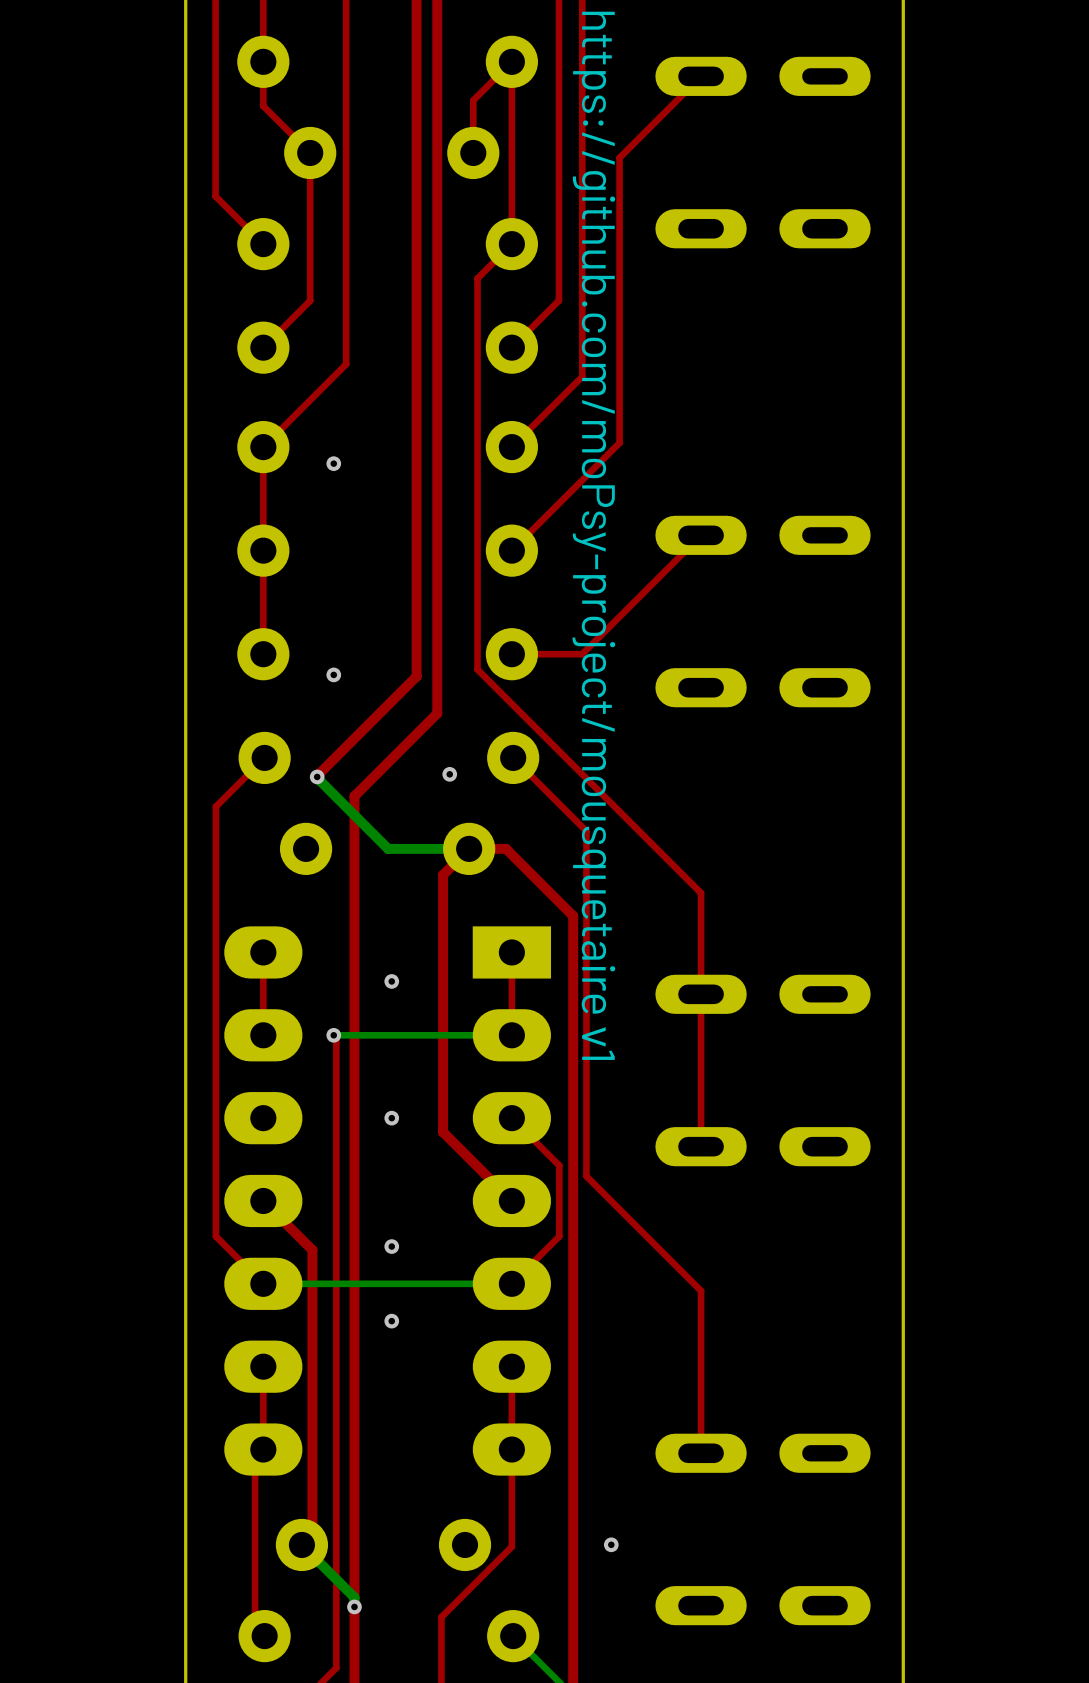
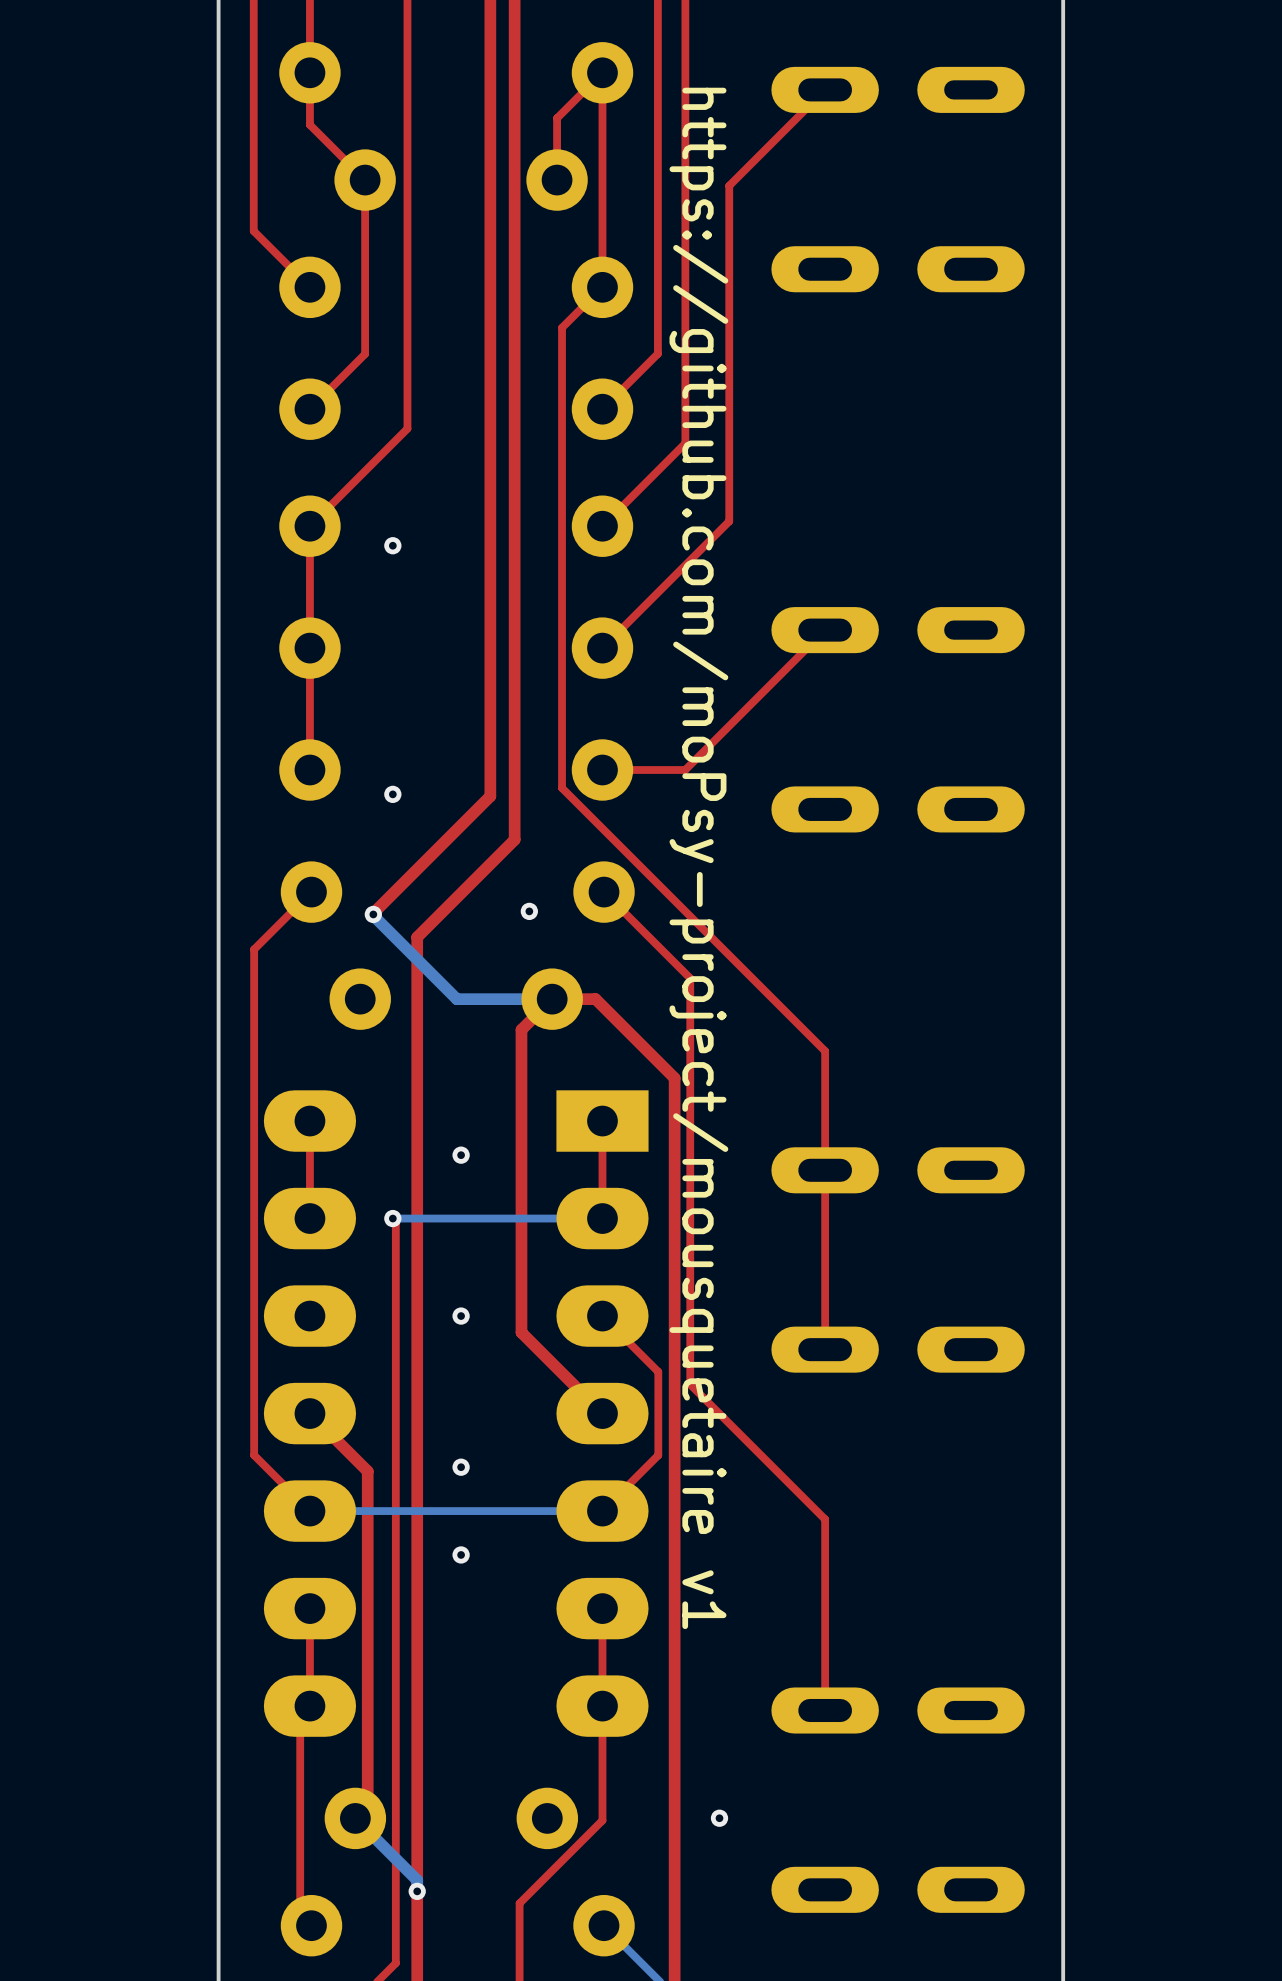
text position: https://github.com/moPsy-project/mousquetaire v1 (593, 535) -> https://github.com/moPsy-project/mousquetaire v1 (698, 858)

